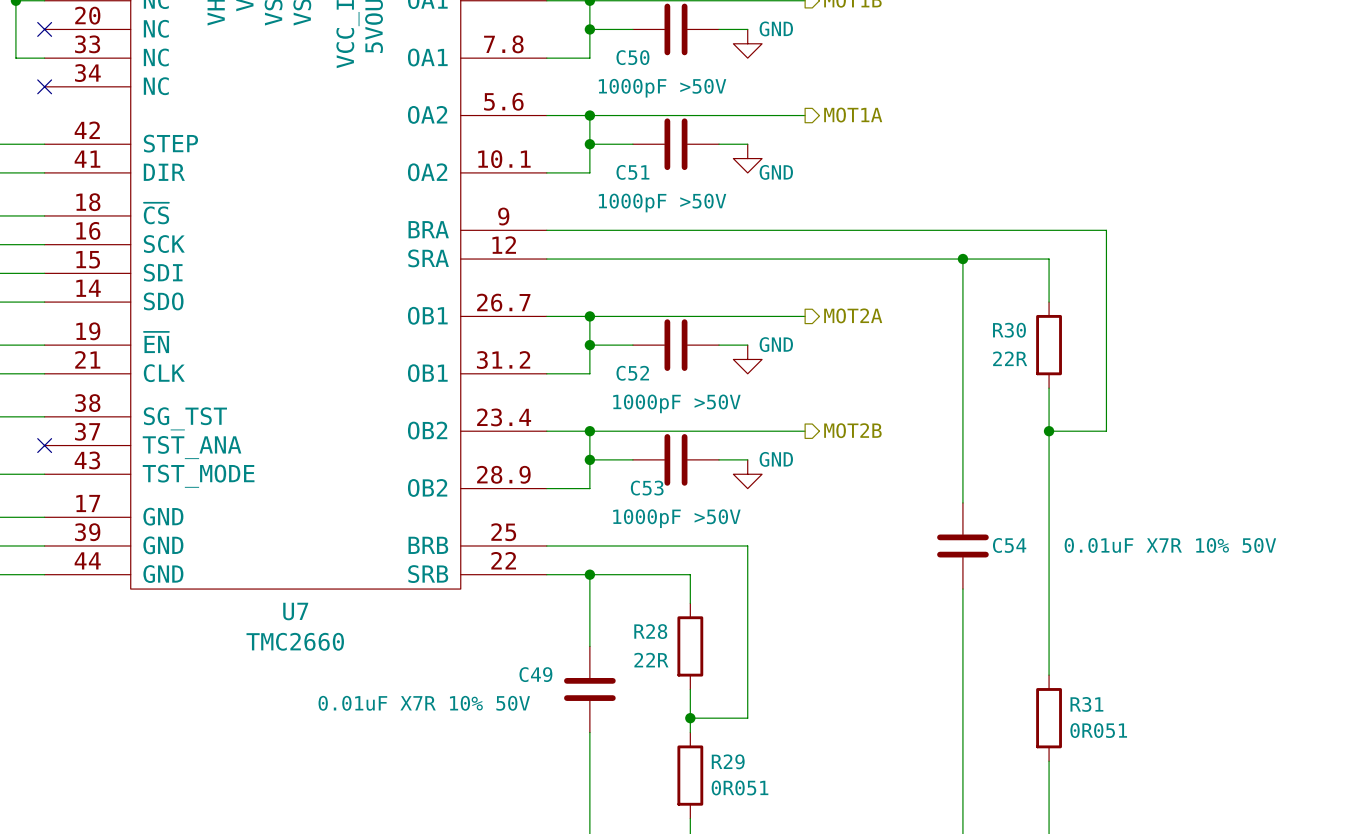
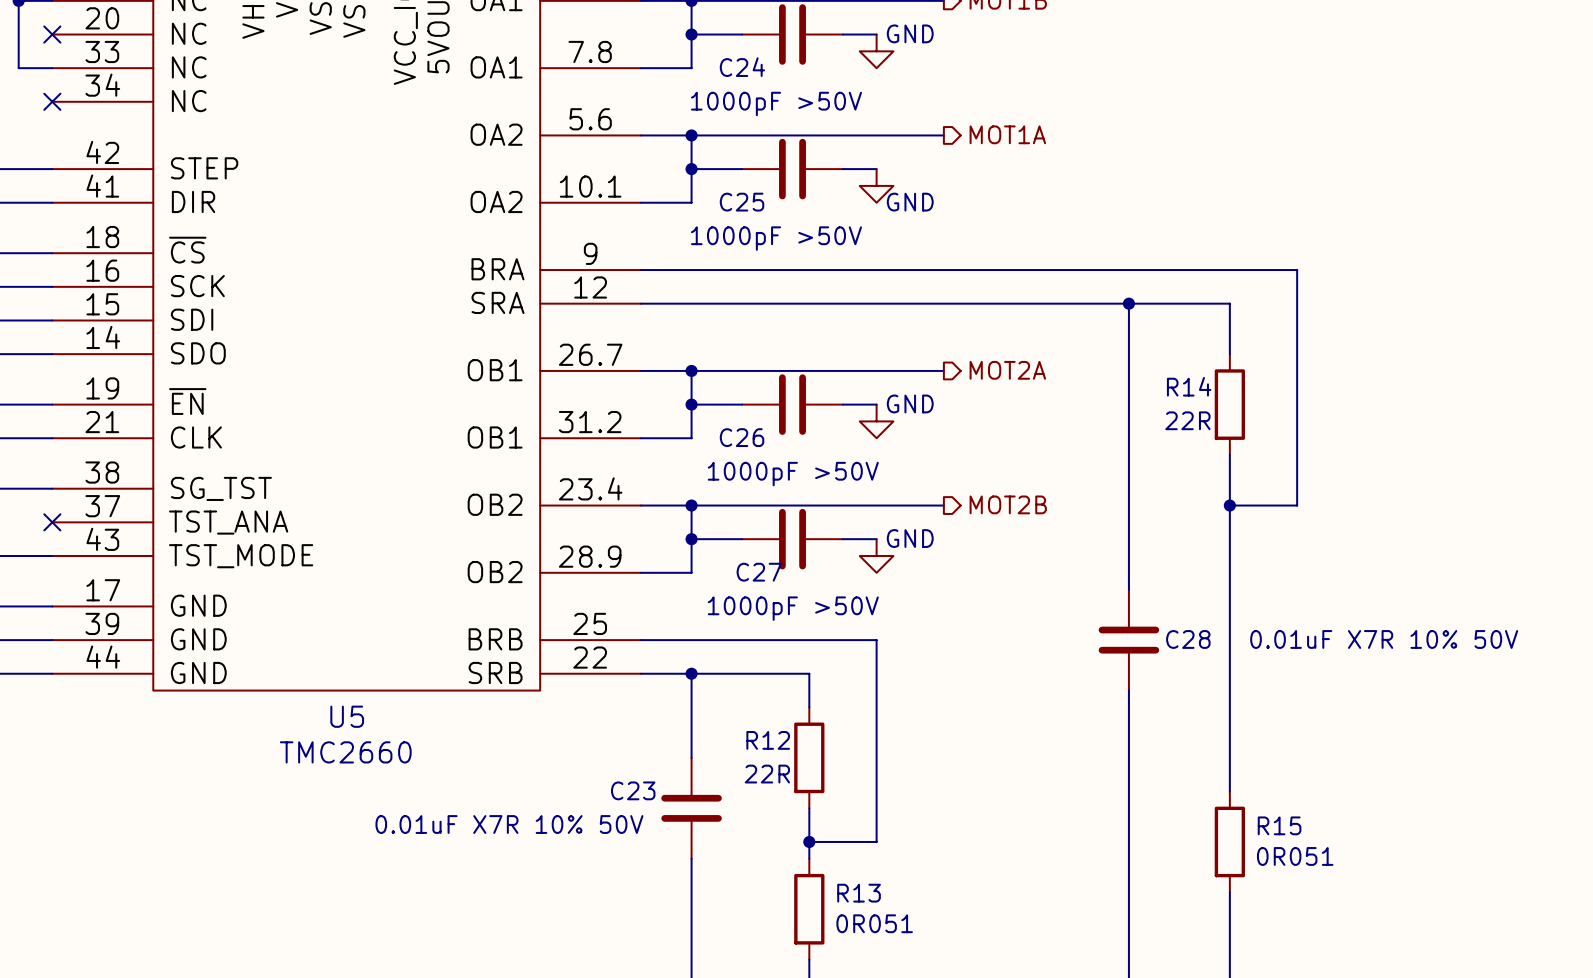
C50 name: C50 (632, 57) -> C24 (742, 67)
C51 name: C51 (632, 172) -> C25 (742, 202)
R30 name: R30 (1009, 330) -> R14 (1189, 386)
C52 name: C52 (632, 373) -> C26 (742, 437)
C53 name: C53 (647, 488) -> C27 (759, 572)
C54 name: C54 (1009, 545) -> C28 (1188, 639)
U7 name: U7 (295, 611) -> U5 (347, 716)
R28 name: R28 (650, 631) -> R12 (768, 740)
C49 name: C49 (535, 674) -> C23 (633, 790)
R31 name: R31 (1086, 704) -> R15 (1279, 825)
R29 name: R29 (728, 761) -> R13 (859, 893)

